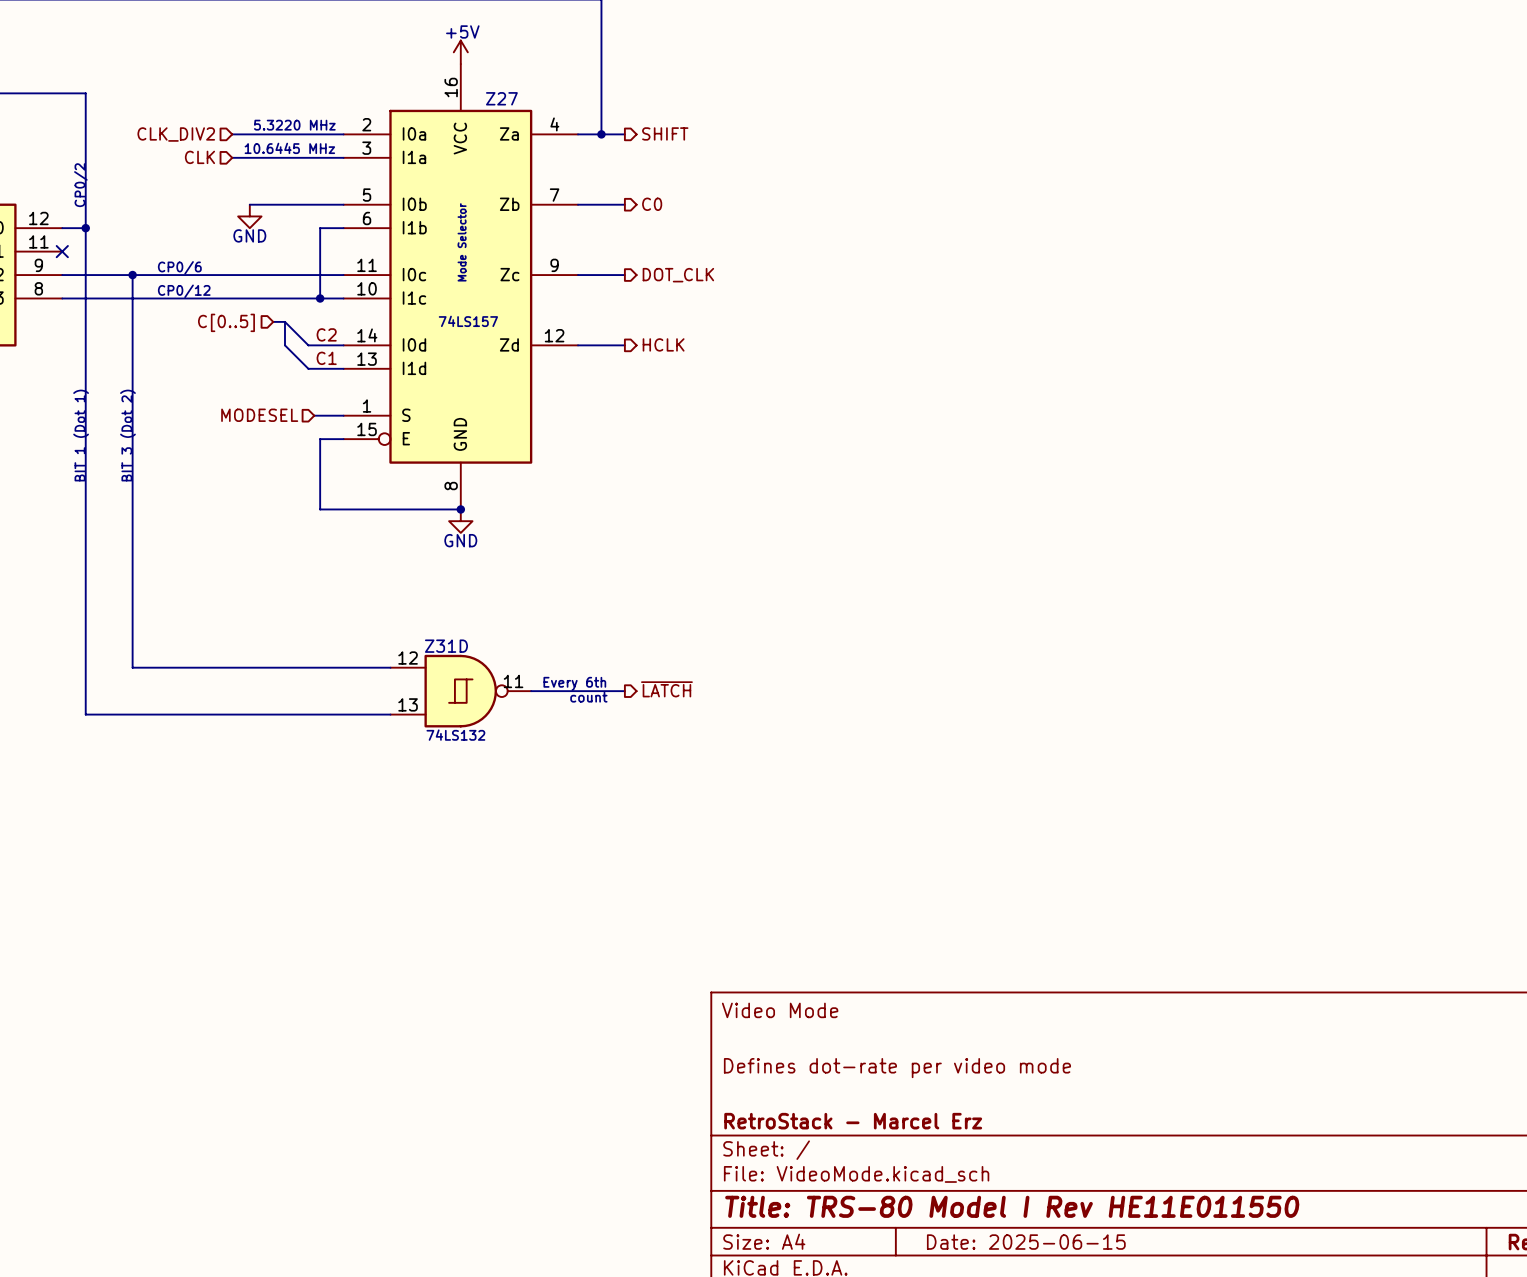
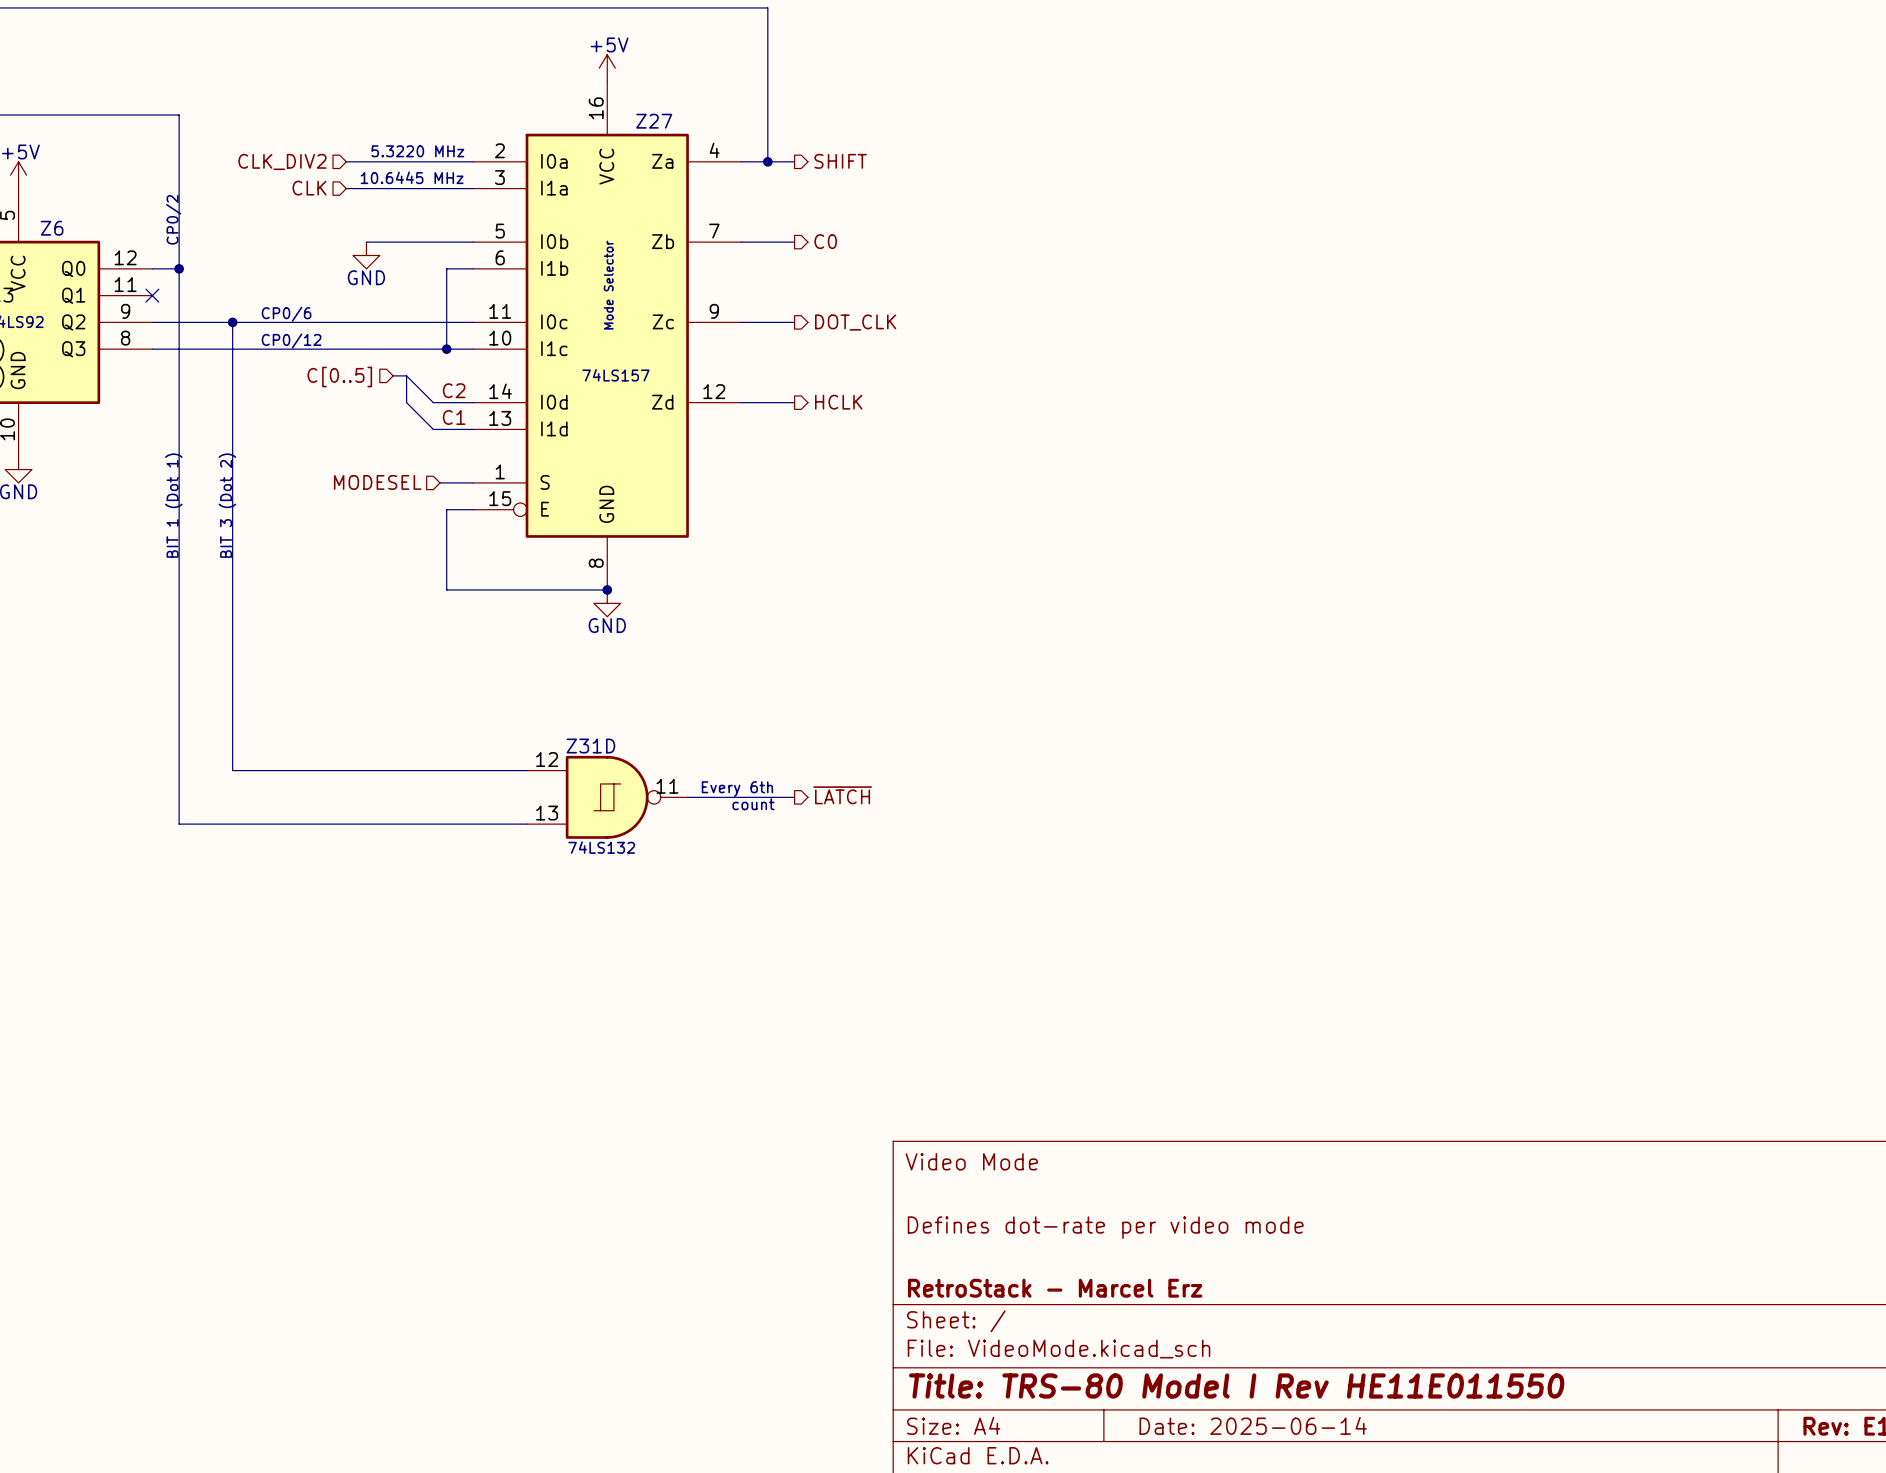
title block: Date: 2025-06-15 (1026, 1242) -> Date: 2025-06-14 (1253, 1425)

